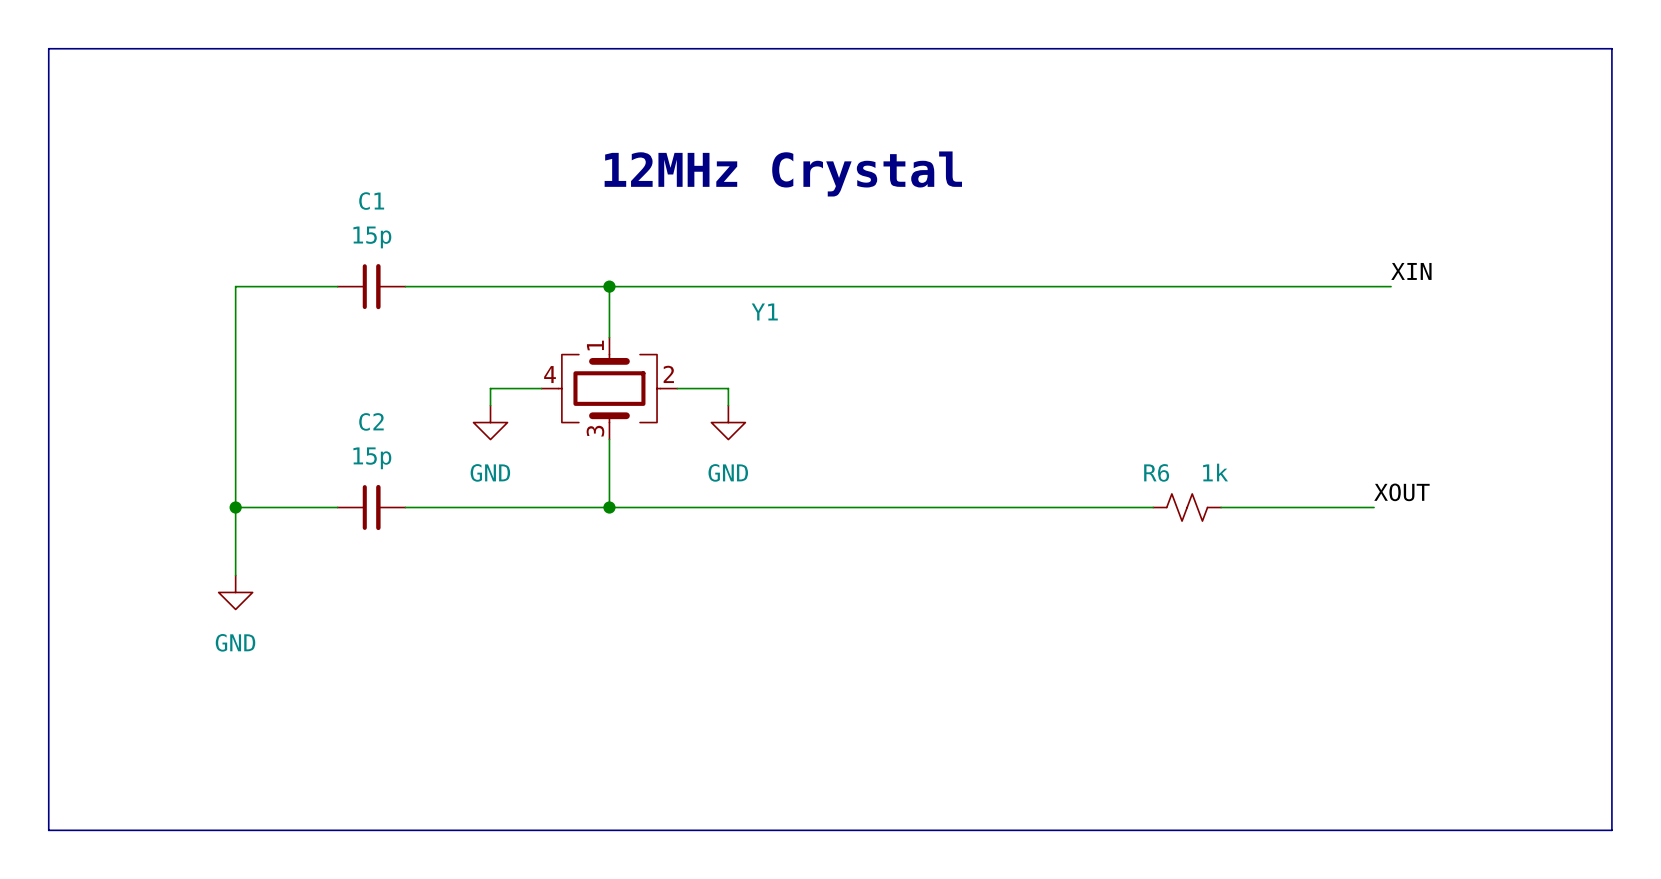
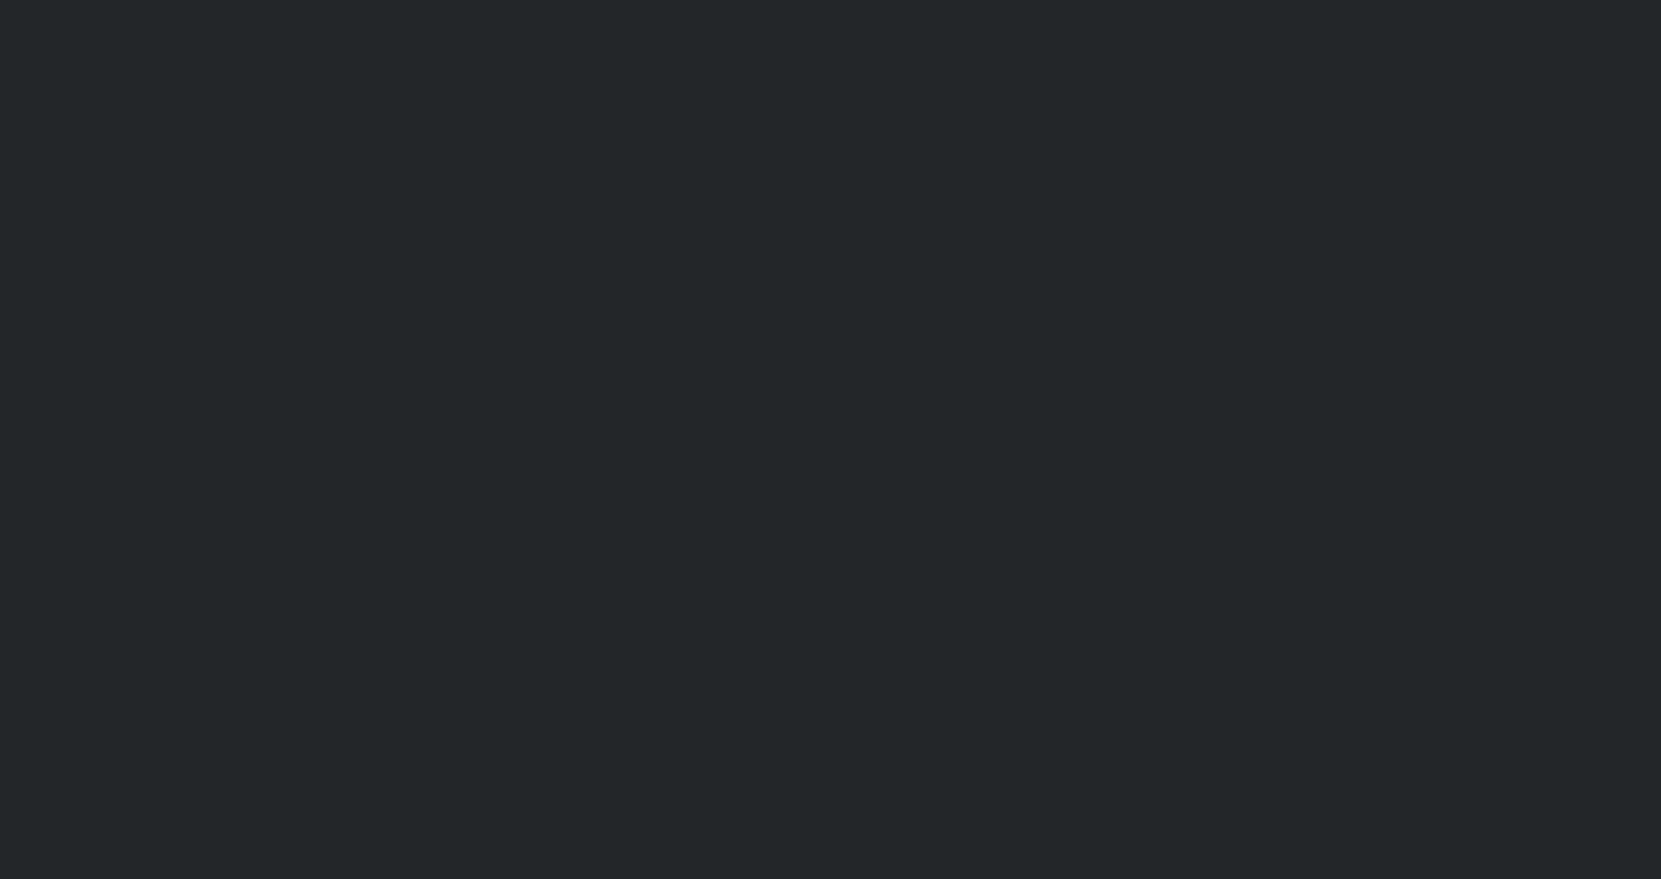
line: (48, 48) (1611, 48) (1611, 830) (48, 830) (48, 48) -> none
text: 12MHz Crystal (783, 173) -> none
label: XIN (1411, 271) -> none
wire: (337, 286) (235, 286) (235, 575) -> none
C1: 15p (371, 286) -> none
wire: (405, 286) (1391, 286) -> none
wire: (609, 286) (609, 337) -> none
junction: (609, 286) -> none
wire: (541, 388) (490, 388) (490, 405) -> none
Y1: (609, 388) -> none
wire: (677, 388) (728, 388) (728, 405) -> none
power symbol: GND (490, 422) -> none
power symbol: GND (728, 422) -> none
wire: (609, 439) (609, 507) -> none
label: XOUT (1401, 492) -> none
wire: (235, 507) (337, 507) -> none
junction: (235, 507) -> none
C2: 15p (371, 507) -> none
wire: (405, 507) (1153, 507) -> none
junction: (609, 507) -> none
R6: 1k (1187, 507) -> none
wire: (1221, 507) (1374, 507) -> none
power symbol: GND (235, 592) -> none

